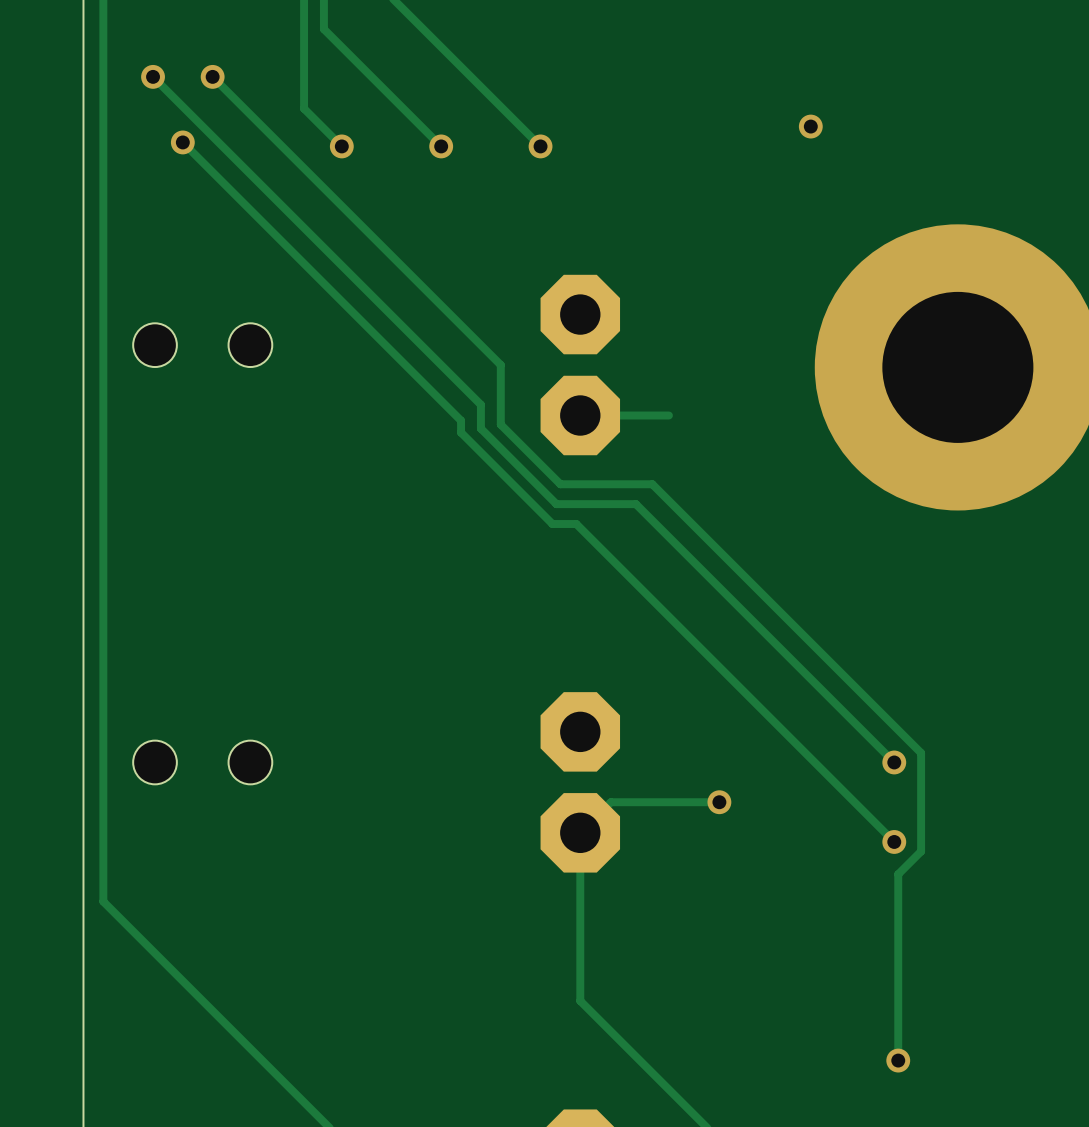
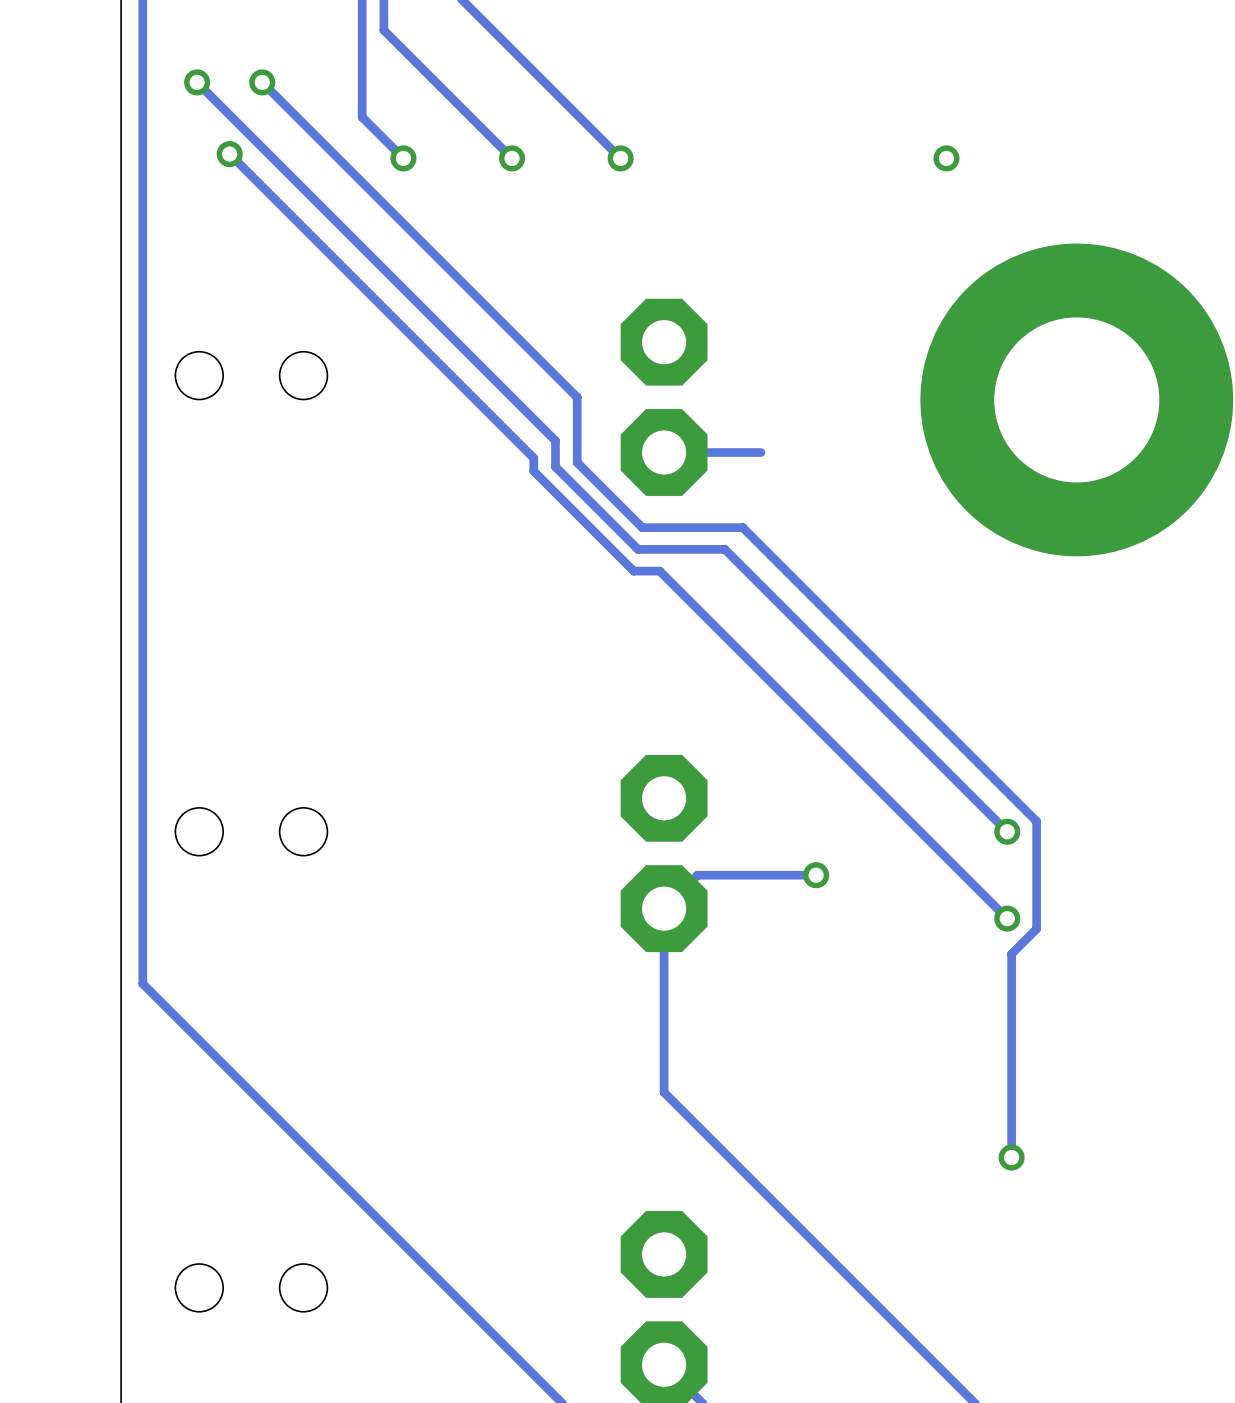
via position: (810, 126) -> (946, 158)

